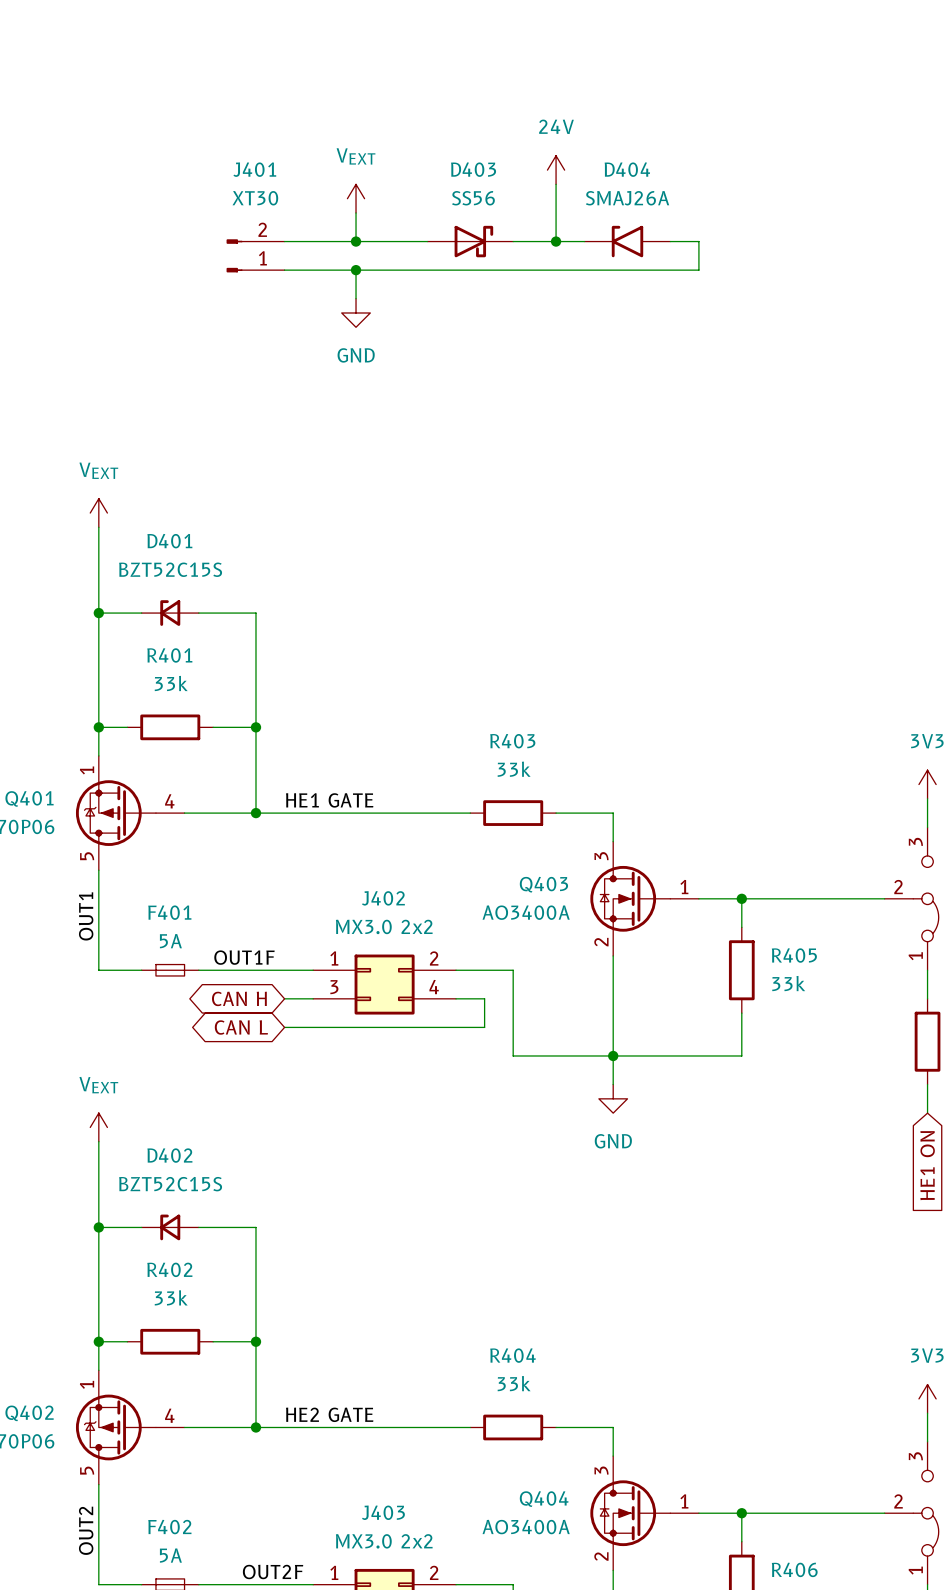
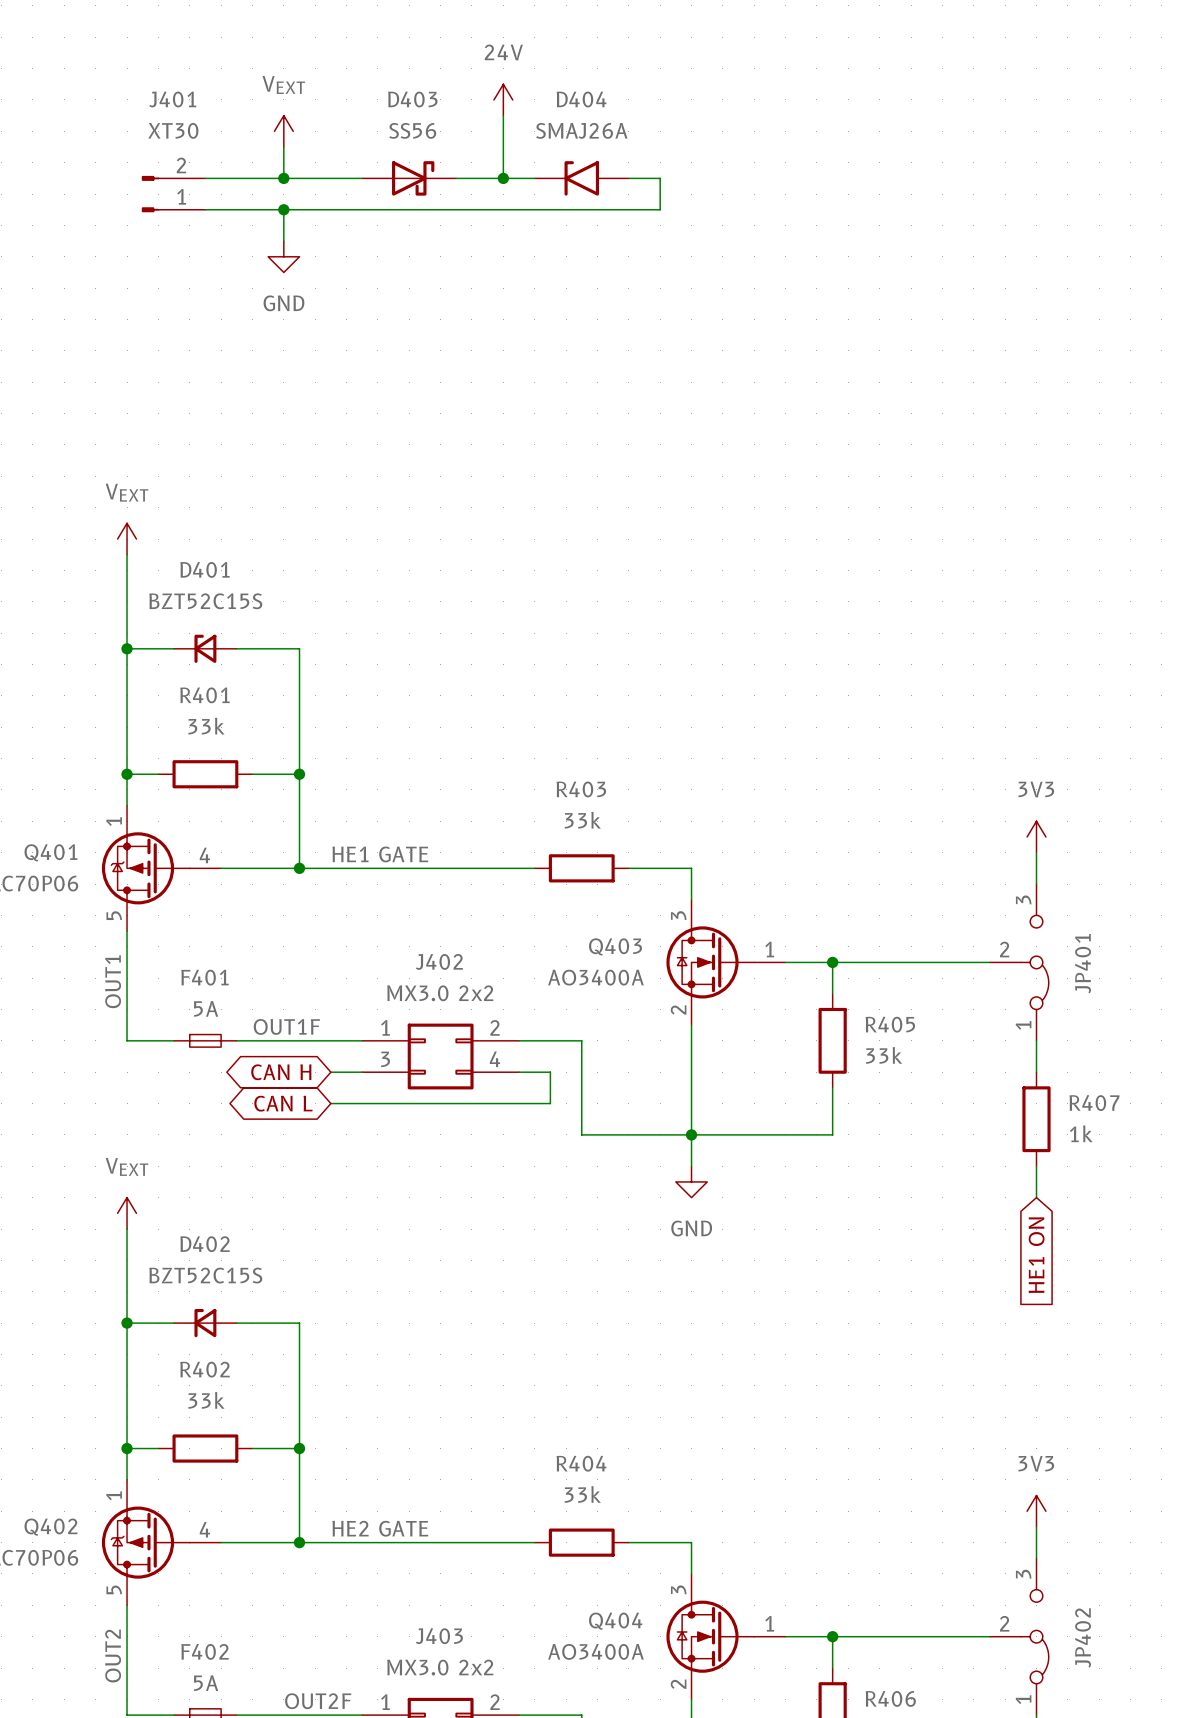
wire: none -> (503, 115) (503, 178)
power symbol position: 24V (556, 170) -> 24V (503, 99)
junction: none -> (283, 178)
junction: none -> (503, 178)
wire: (556, 184) (556, 241) -> (628, 178) (660, 178) (660, 209) (205, 209)
power symbol position: VEXT (356, 198) -> VEXT (283, 131)
junction: none -> (283, 209)
wire: (356, 212) (356, 241) -> (283, 147) (283, 178)
wire: (284, 241) (427, 241) -> (205, 178) (362, 178)
junction: (356, 241) -> none
D403 position: (470, 241) -> (409, 178)
wire: (513, 241) (584, 241) -> (456, 178) (534, 178)
junction: (556, 241) -> none
D404 position: (627, 241) -> (581, 178)
wire: (670, 241) (698, 241) (698, 270) (284, 270) -> none
J401 position: (255, 255) -> (173, 194)
wire: (356, 270) (356, 298) -> (283, 209) (283, 241)
junction: (356, 270) -> none
power symbol position: GND (356, 312) -> GND (283, 256)

